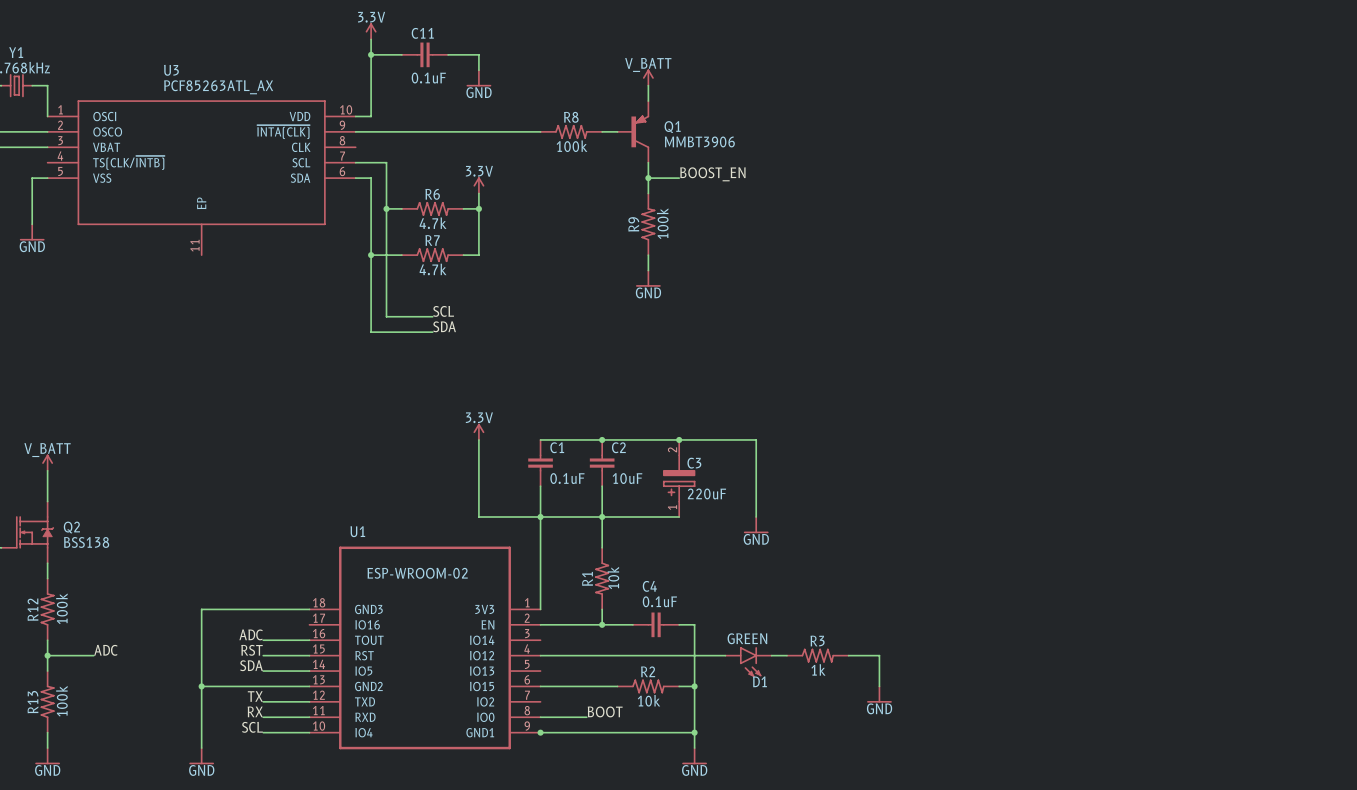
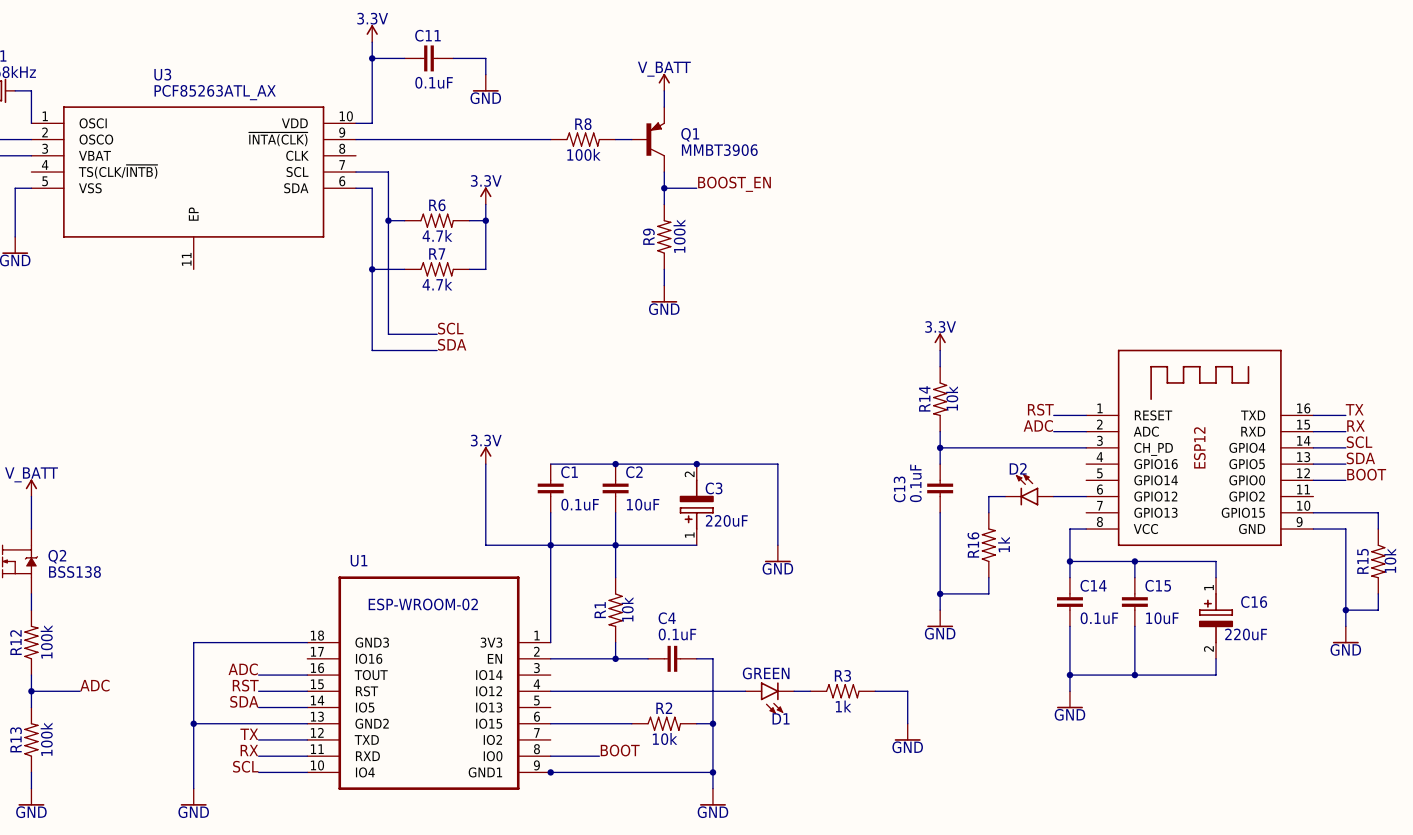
power symbol: none -> 3.3V (940, 341)
wire: none -> (940, 350) (940, 366)
R14: none -> 10k (940, 399)
label: none -> RST (1040, 409)
label: none -> TX (1354, 409)
wire: none -> (1053, 415) (1086, 415)
wire: none -> (1313, 415) (1345, 415)
label: none -> ADC (1038, 425)
label: none -> RX (1355, 425)
wire: none -> (940, 431) (940, 464)
wire: none -> (1053, 431) (1086, 431)
wire: none -> (1313, 431) (1345, 431)
label: none -> SCL (1359, 442)
wire: none -> (940, 447) (1086, 447)
junction: none -> (940, 447)
part: none -> (1199, 447)
wire: none -> (1313, 447) (1345, 447)
label: none -> SDA (1360, 458)
wire: none -> (1313, 464) (1345, 464)
label: none -> BOOT (1366, 474)
wire: none -> (1313, 480) (1345, 480)
C13: none -> 0.1uF (940, 488)
D2: none -> (1029, 489)
wire: none -> (1005, 496) (988, 496) (988, 512)
wire: none -> (1053, 496) (1086, 496)
wire: none -> (940, 512) (940, 610)
wire: none -> (1313, 512) (1378, 512) (1378, 529)
wire: none -> (1086, 529) (1069, 529) (1069, 577)
wire: none -> (1313, 529) (1345, 529) (1345, 626)
R16: none -> 1k (988, 545)
wire: none -> (1069, 561) (1216, 561) (1216, 577)
junction: none -> (1069, 561)
wire: none -> (1134, 561) (1134, 577)
junction: none -> (1134, 561)
R15: none -> 10k (1378, 561)
wire: none -> (988, 577) (988, 593) (940, 593)
junction: none -> (940, 593)
wire: none -> (1378, 593) (1378, 610) (1345, 610)
C14: none -> 0.1uF (1069, 602)
C15: none -> 10uF (1134, 602)
junction: none -> (1345, 610)
power symbol: none -> GND (940, 618)
C16: none -> 220uF (1216, 618)
wire: none -> (1069, 626) (1069, 691)
wire: none -> (1134, 626) (1134, 675)
power symbol: none -> GND (1345, 634)
wire: none -> (1216, 658) (1216, 675) (1069, 675)
junction: none -> (1069, 675)
junction: none -> (1134, 675)
power symbol: none -> GND (1069, 699)

